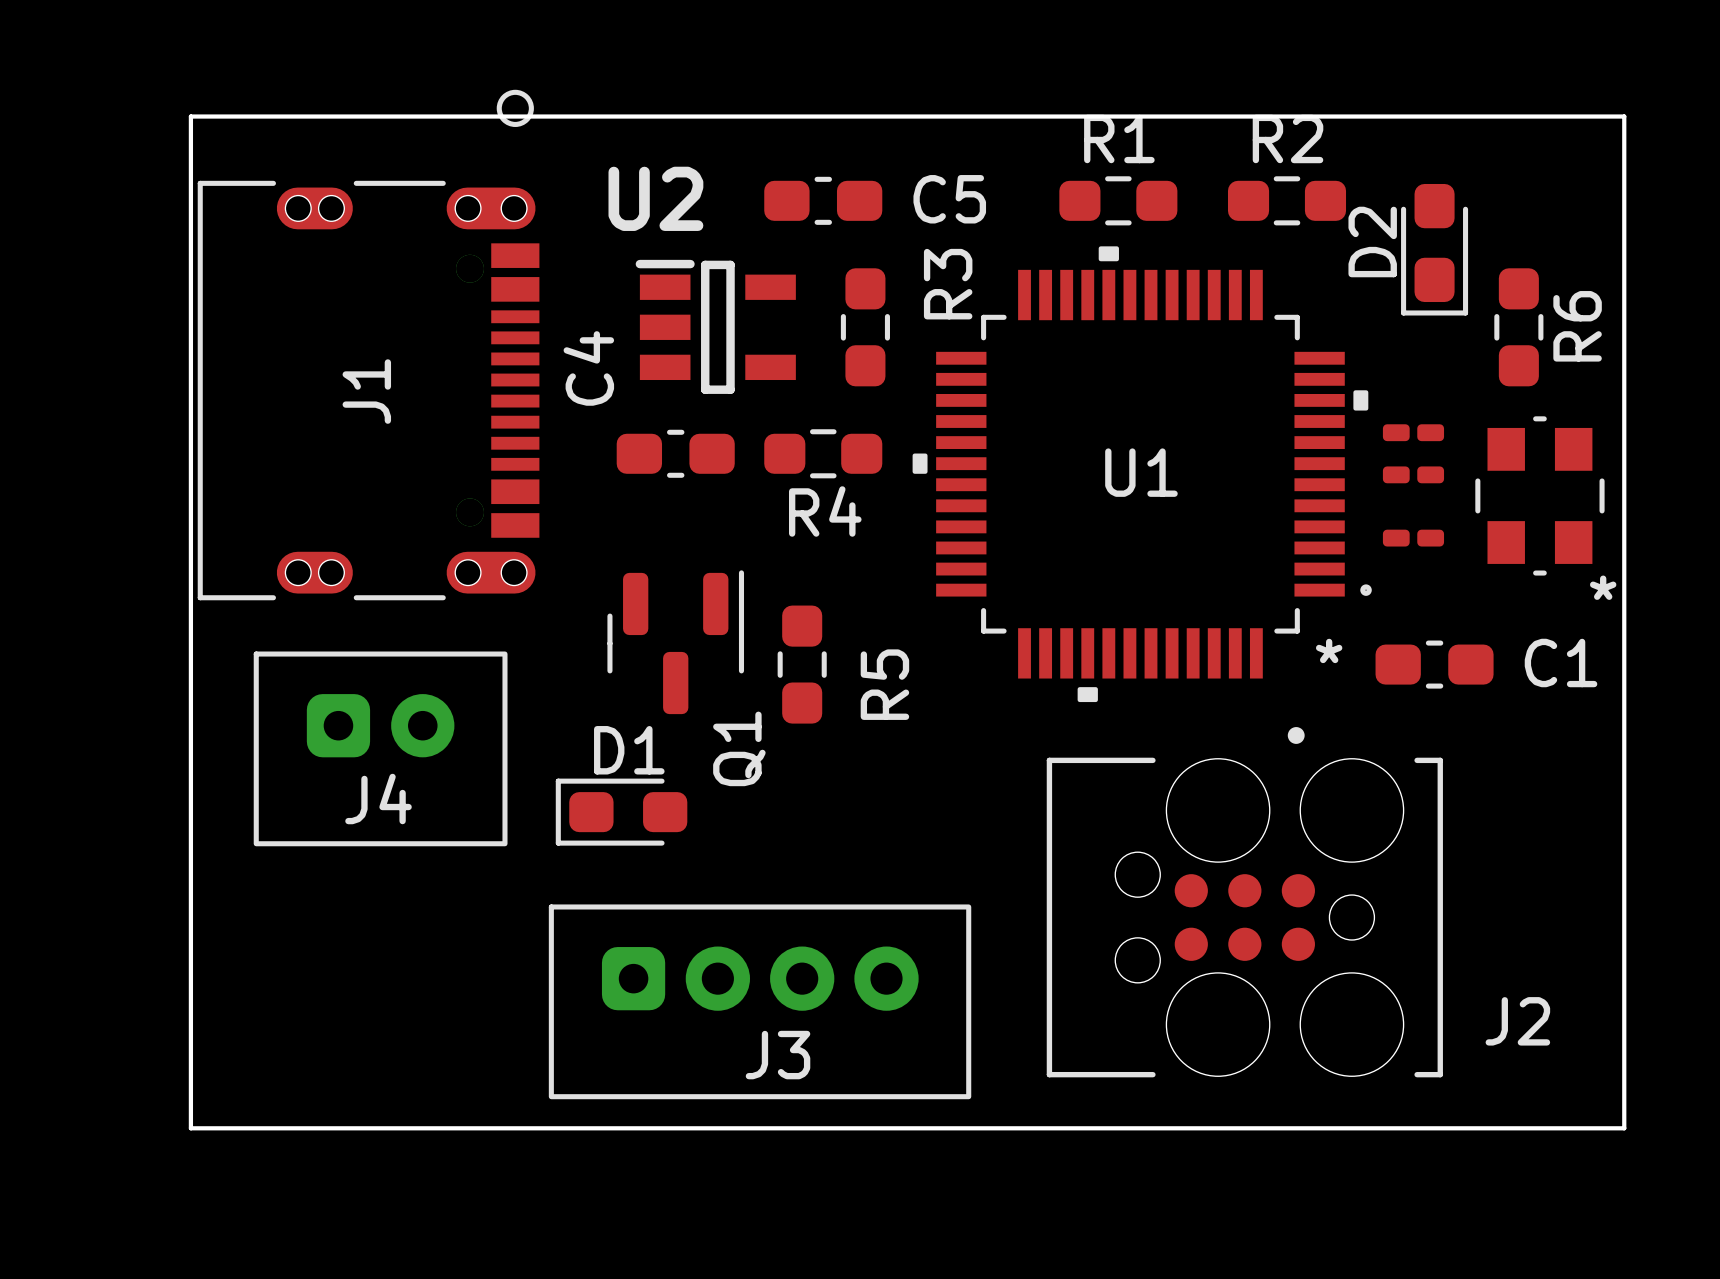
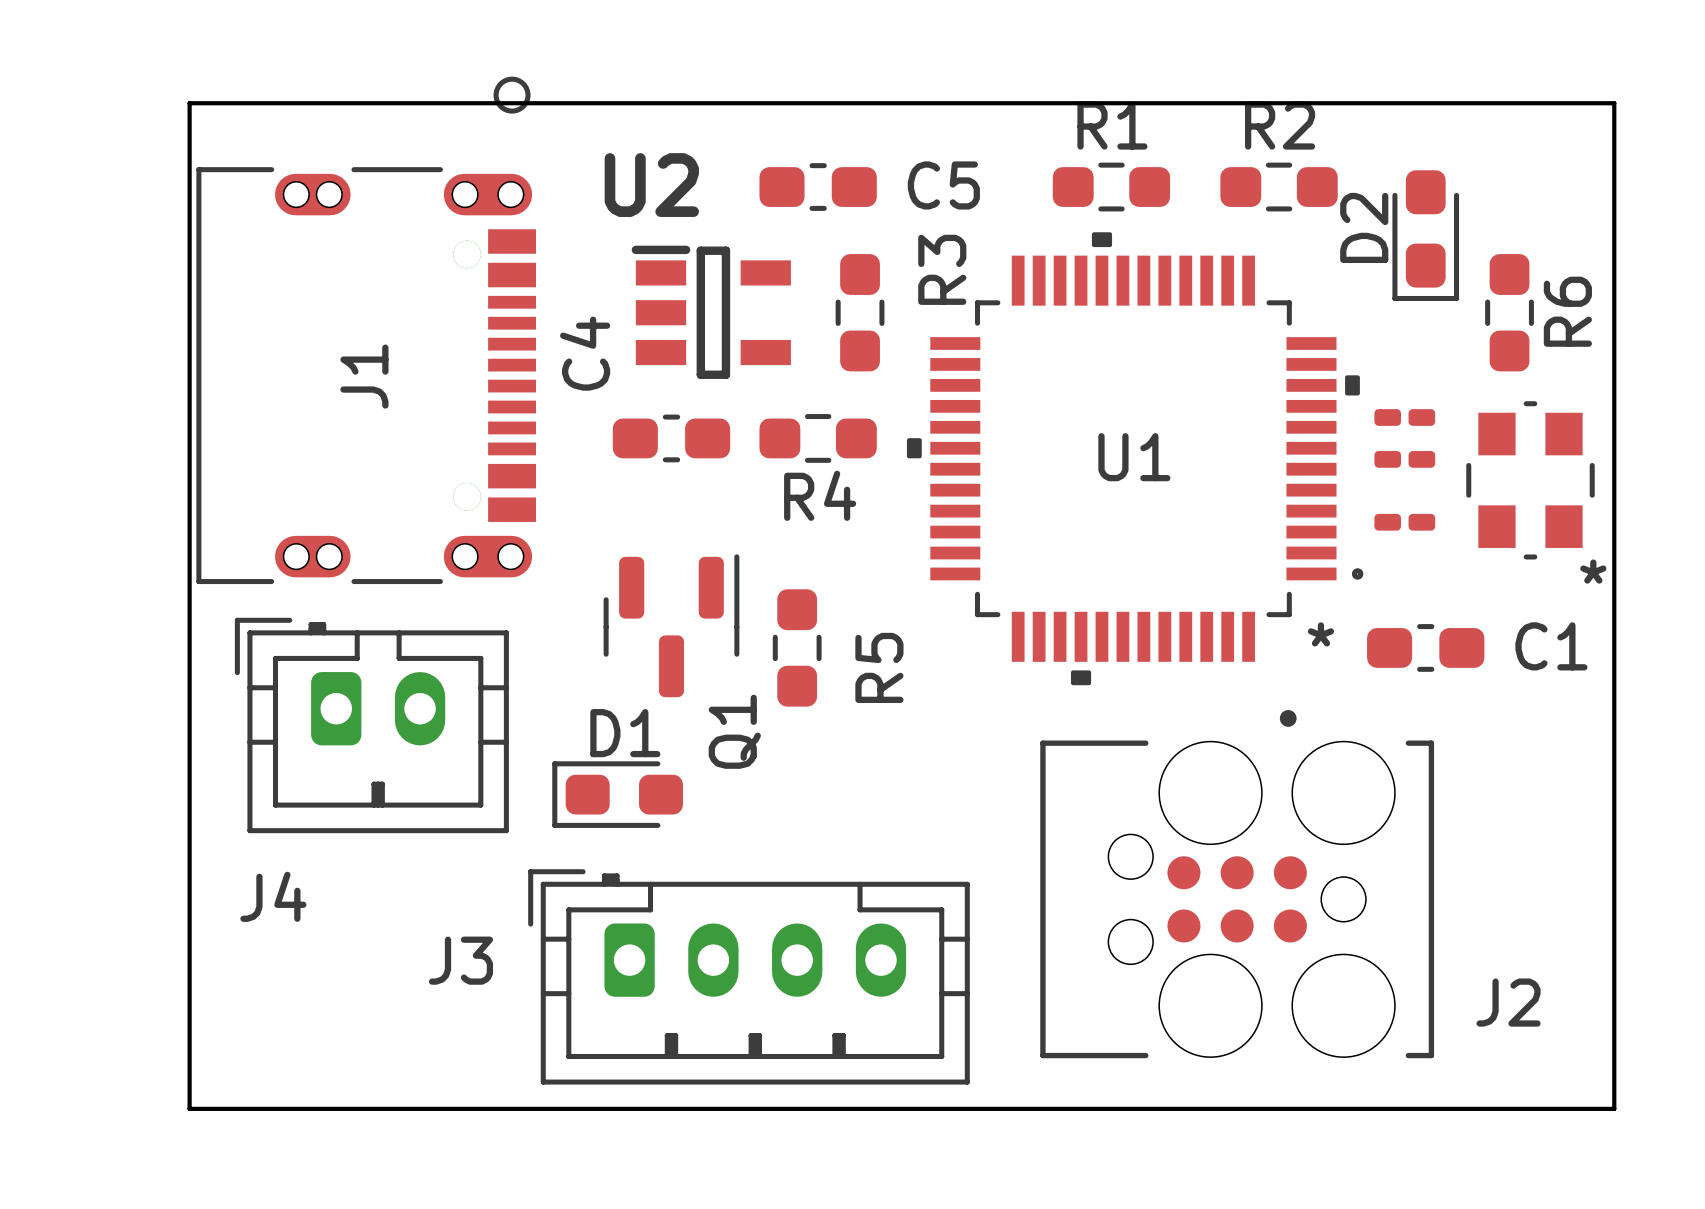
J4 footprint: [253, 651, 508, 847] -> [234, 617, 509, 834]
J4 name position: J4 (378, 799) -> J4 (273, 896)
J3 footprint: [548, 904, 972, 1100] -> [528, 869, 970, 1085]
J3 name position: J3 (778, 1055) -> J3 (460, 960)

